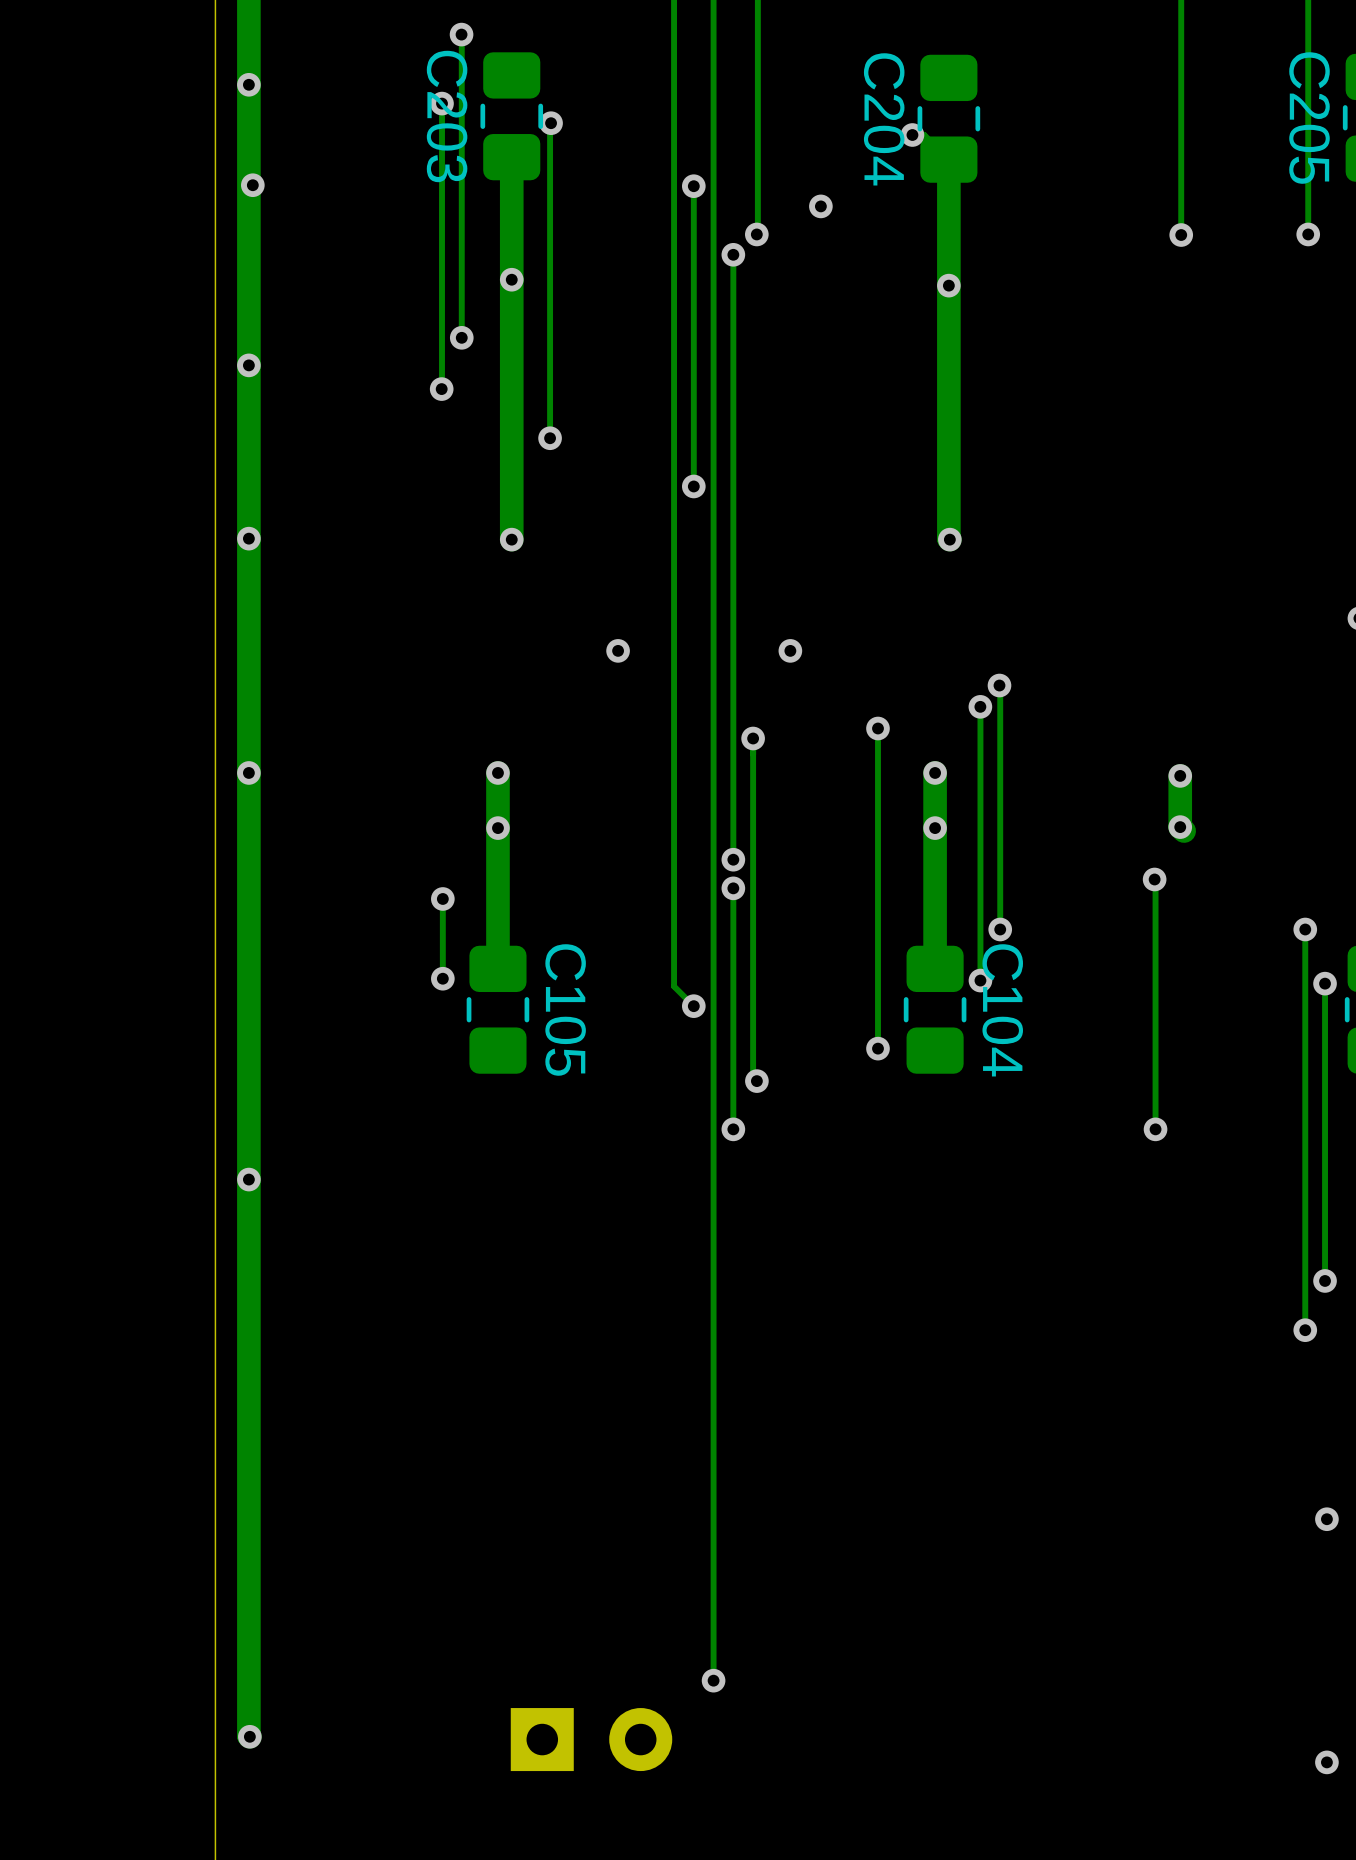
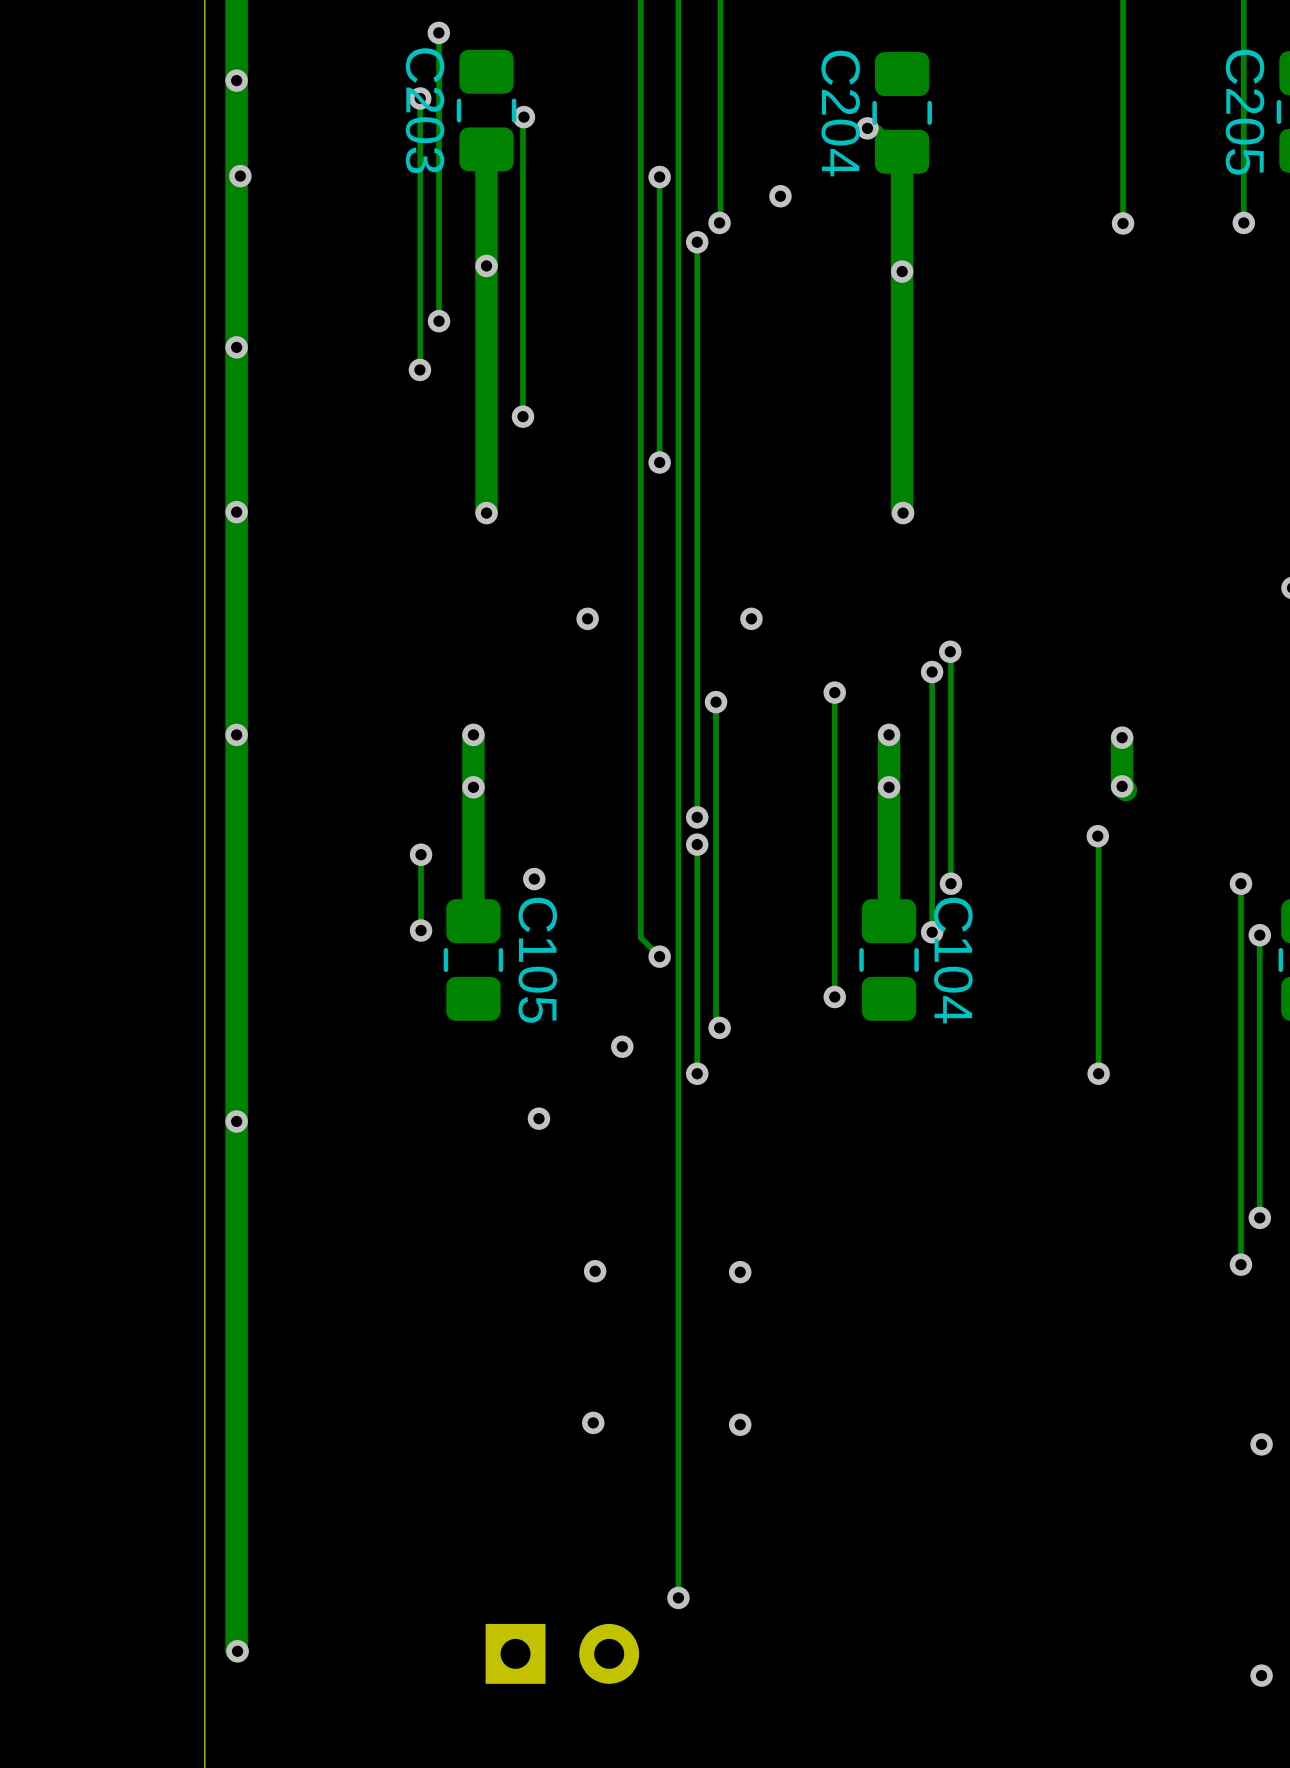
via: none -> (534, 879)
via: none -> (622, 1046)
via: none -> (538, 1118)
via: none -> (595, 1271)
via: none -> (740, 1272)
via: none -> (593, 1422)
via: none -> (740, 1424)

